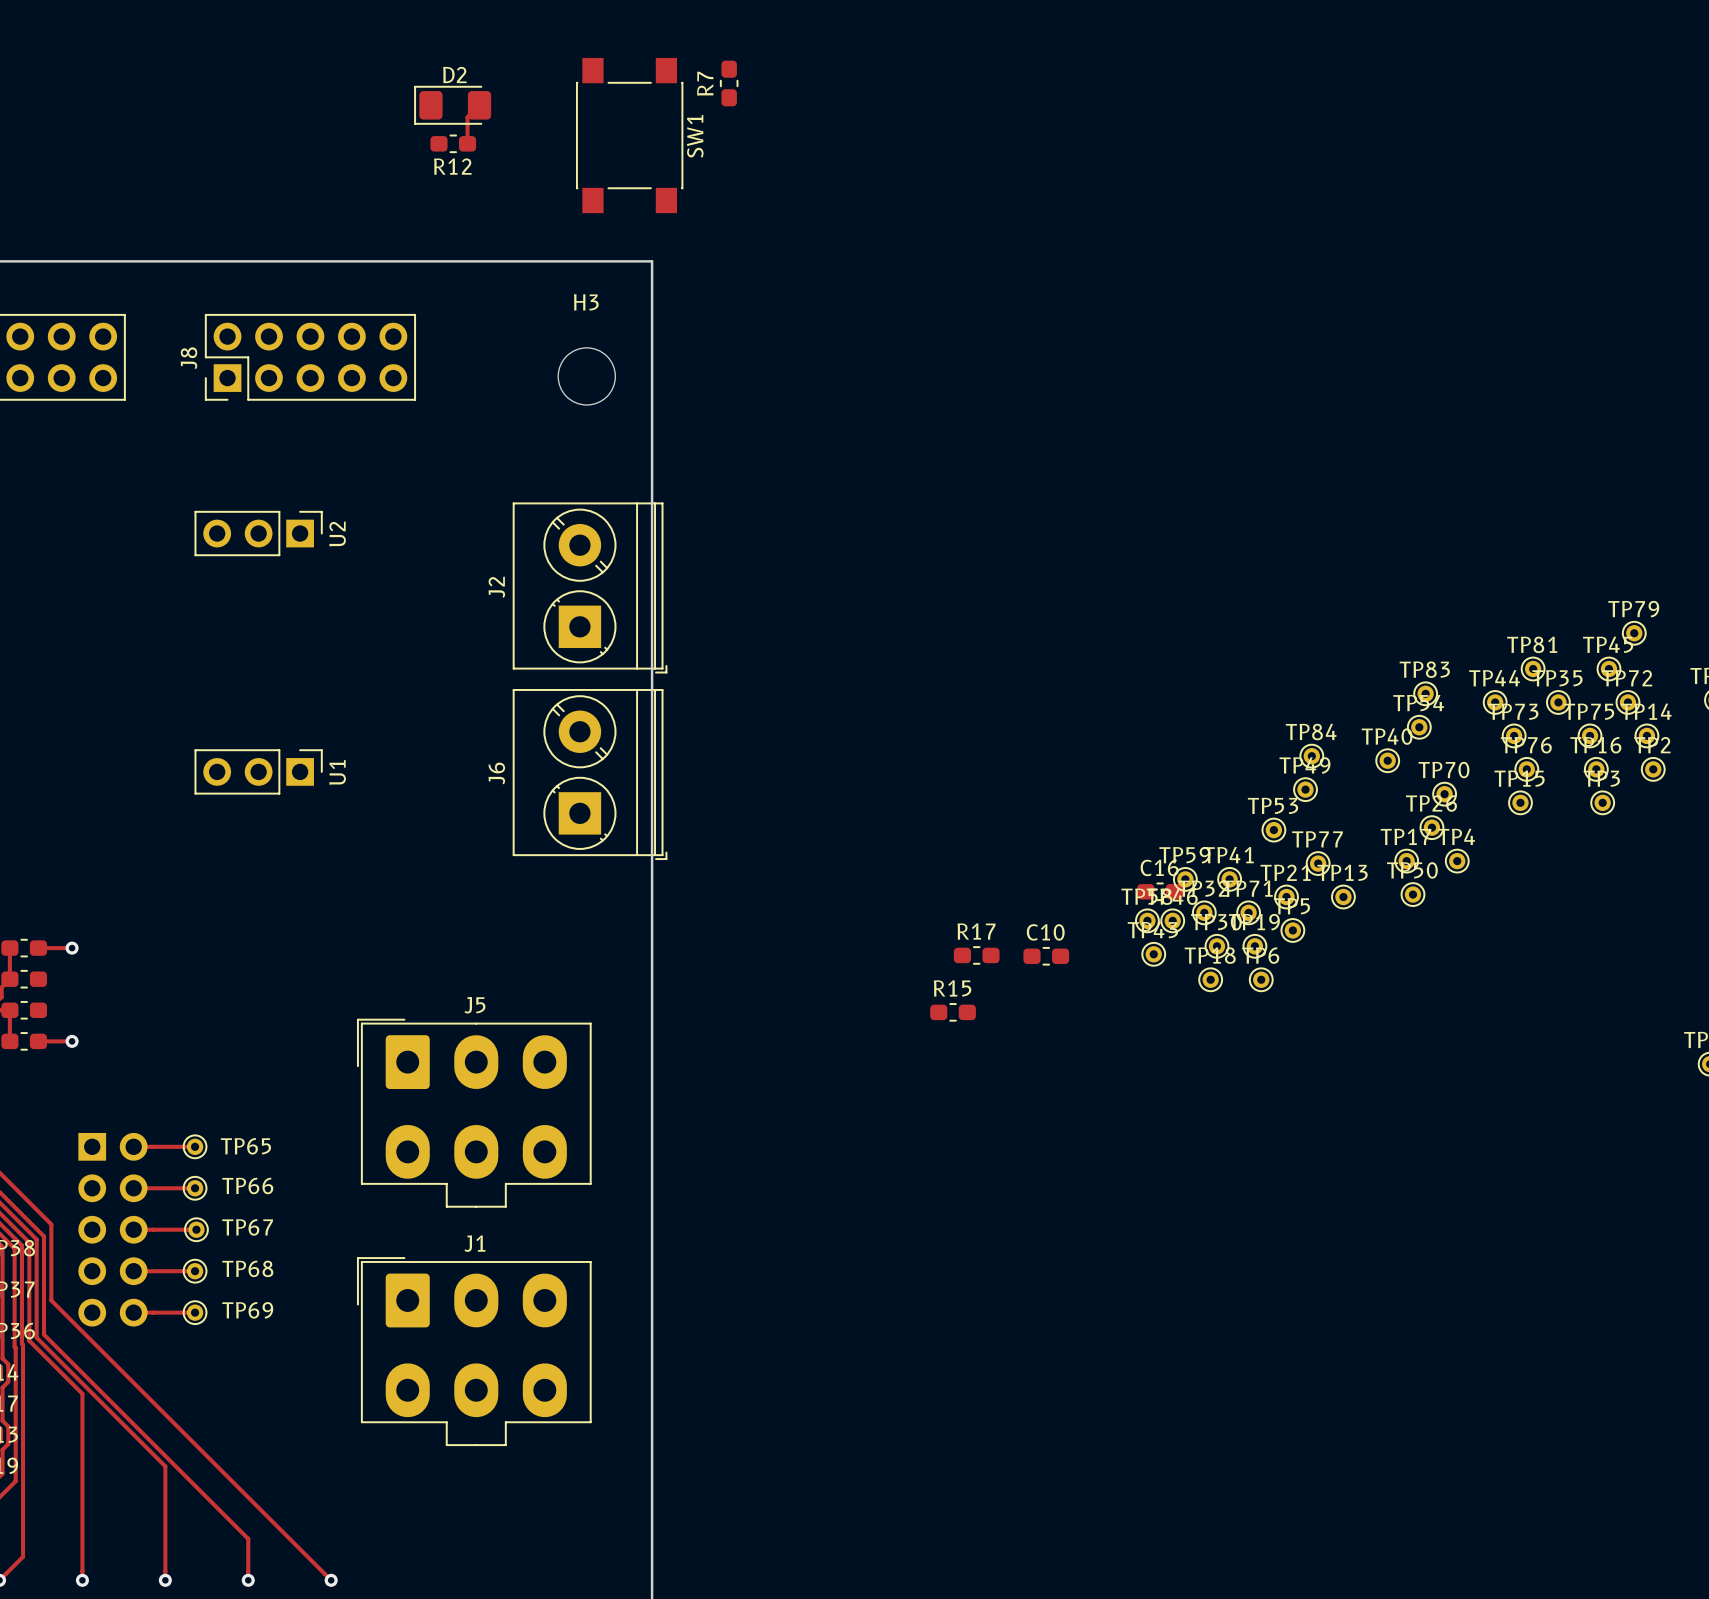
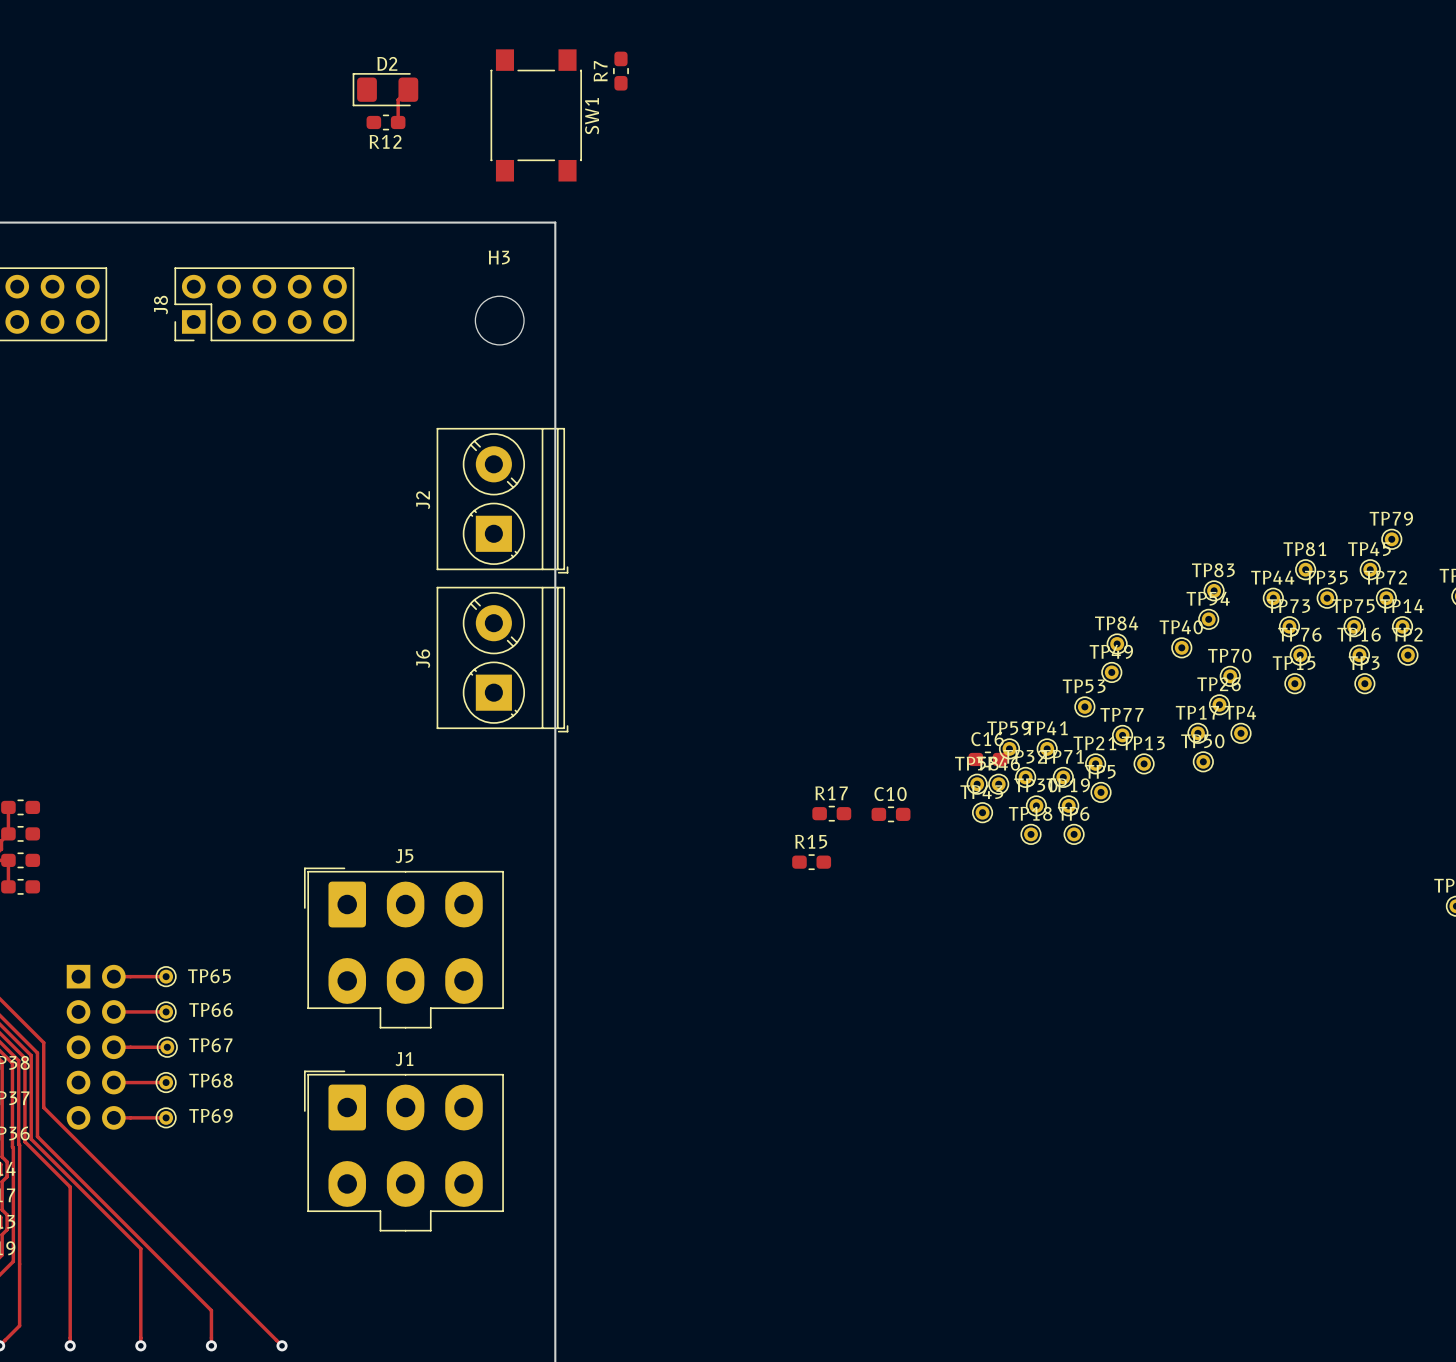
U2: (258, 533) -> none
U1: (258, 771) -> none
track: (38, 948) (72, 948) -> none
via: (72, 948) -> none
track: (38, 1041) (72, 1041) -> none
via: (72, 1041) -> none

